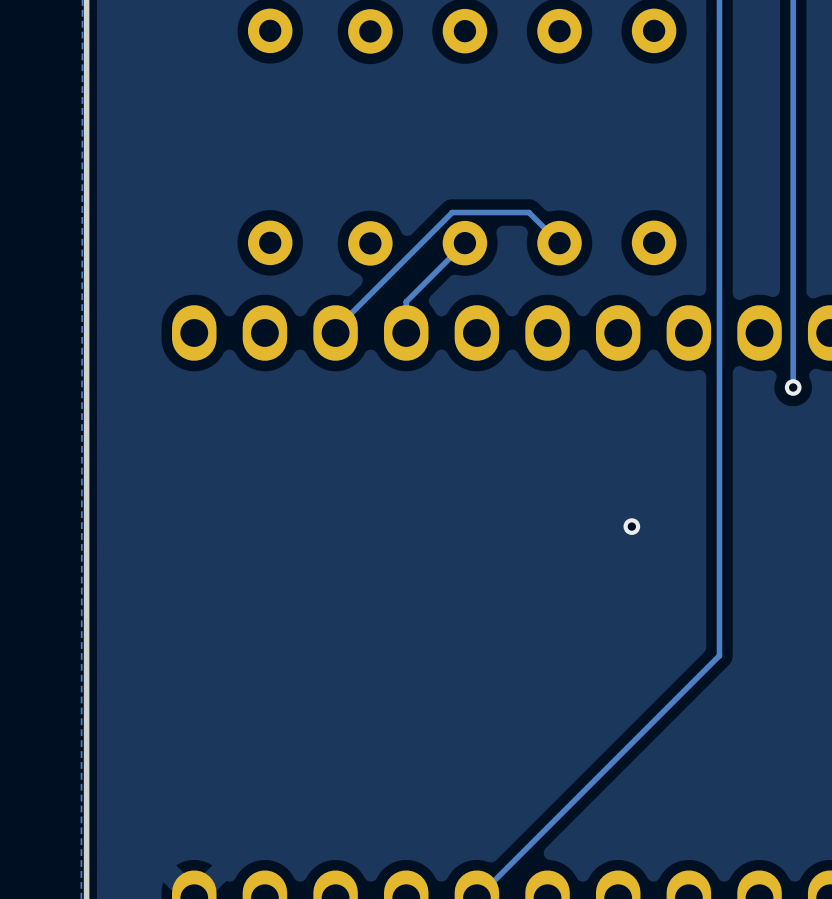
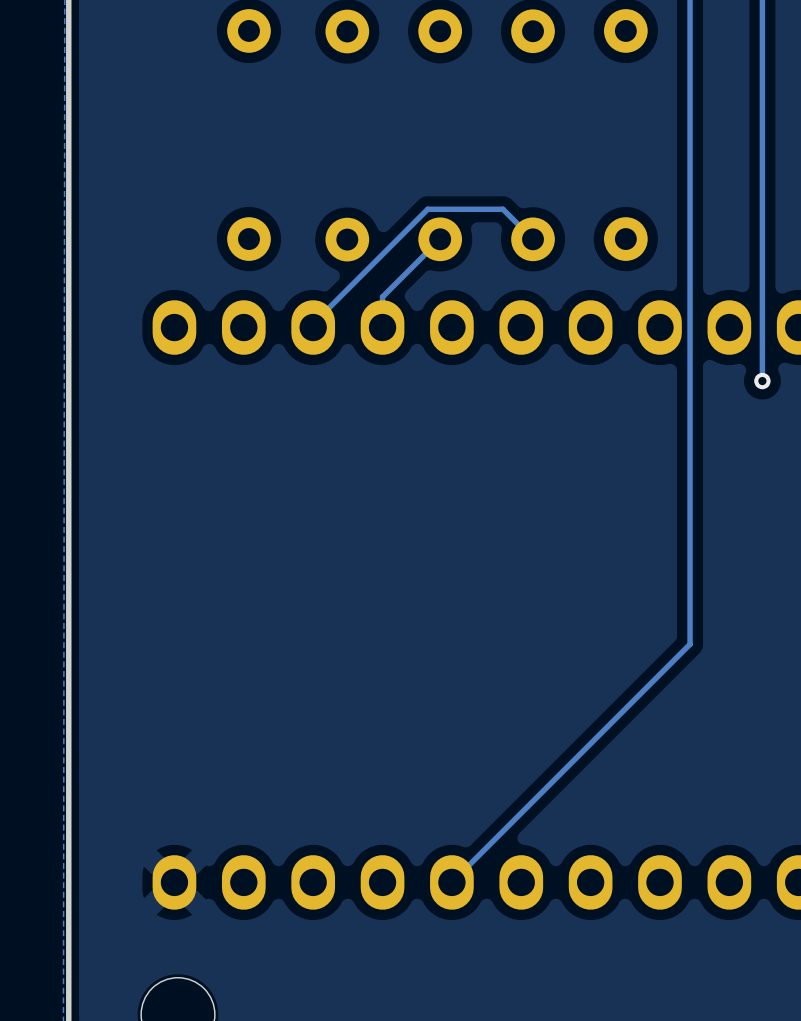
via: (631, 526) -> none

